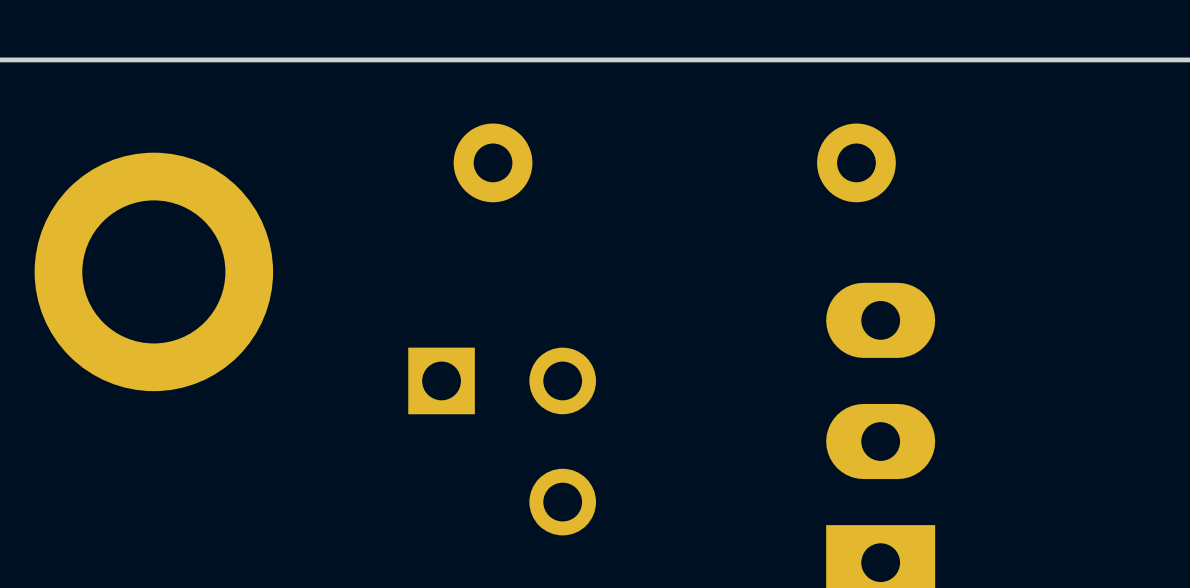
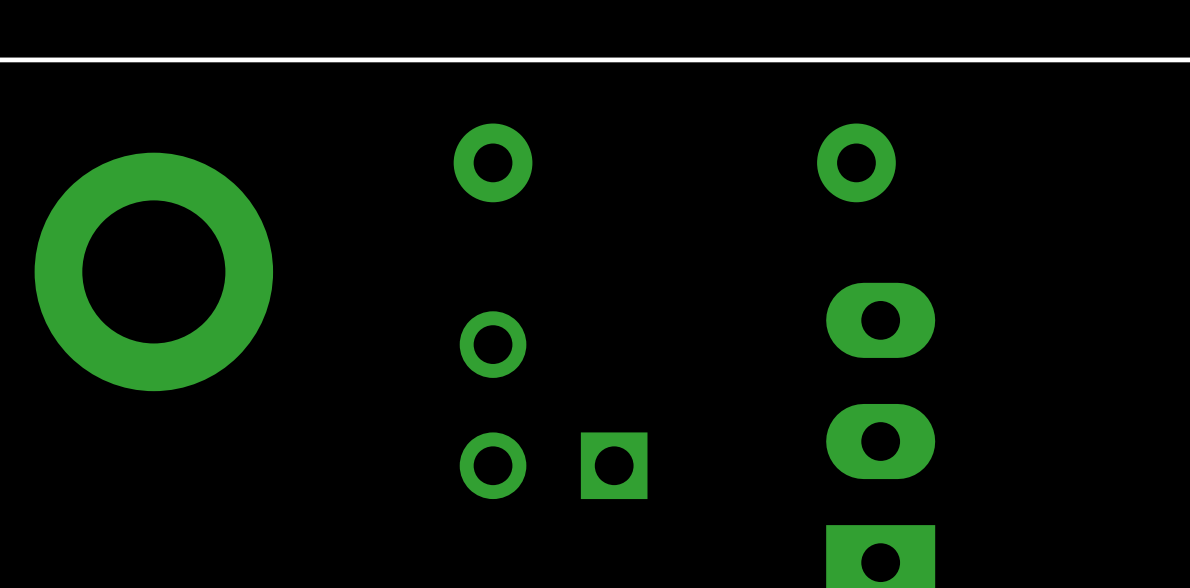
part rotation: 0° (502, 441) -> 180° (553, 405)

